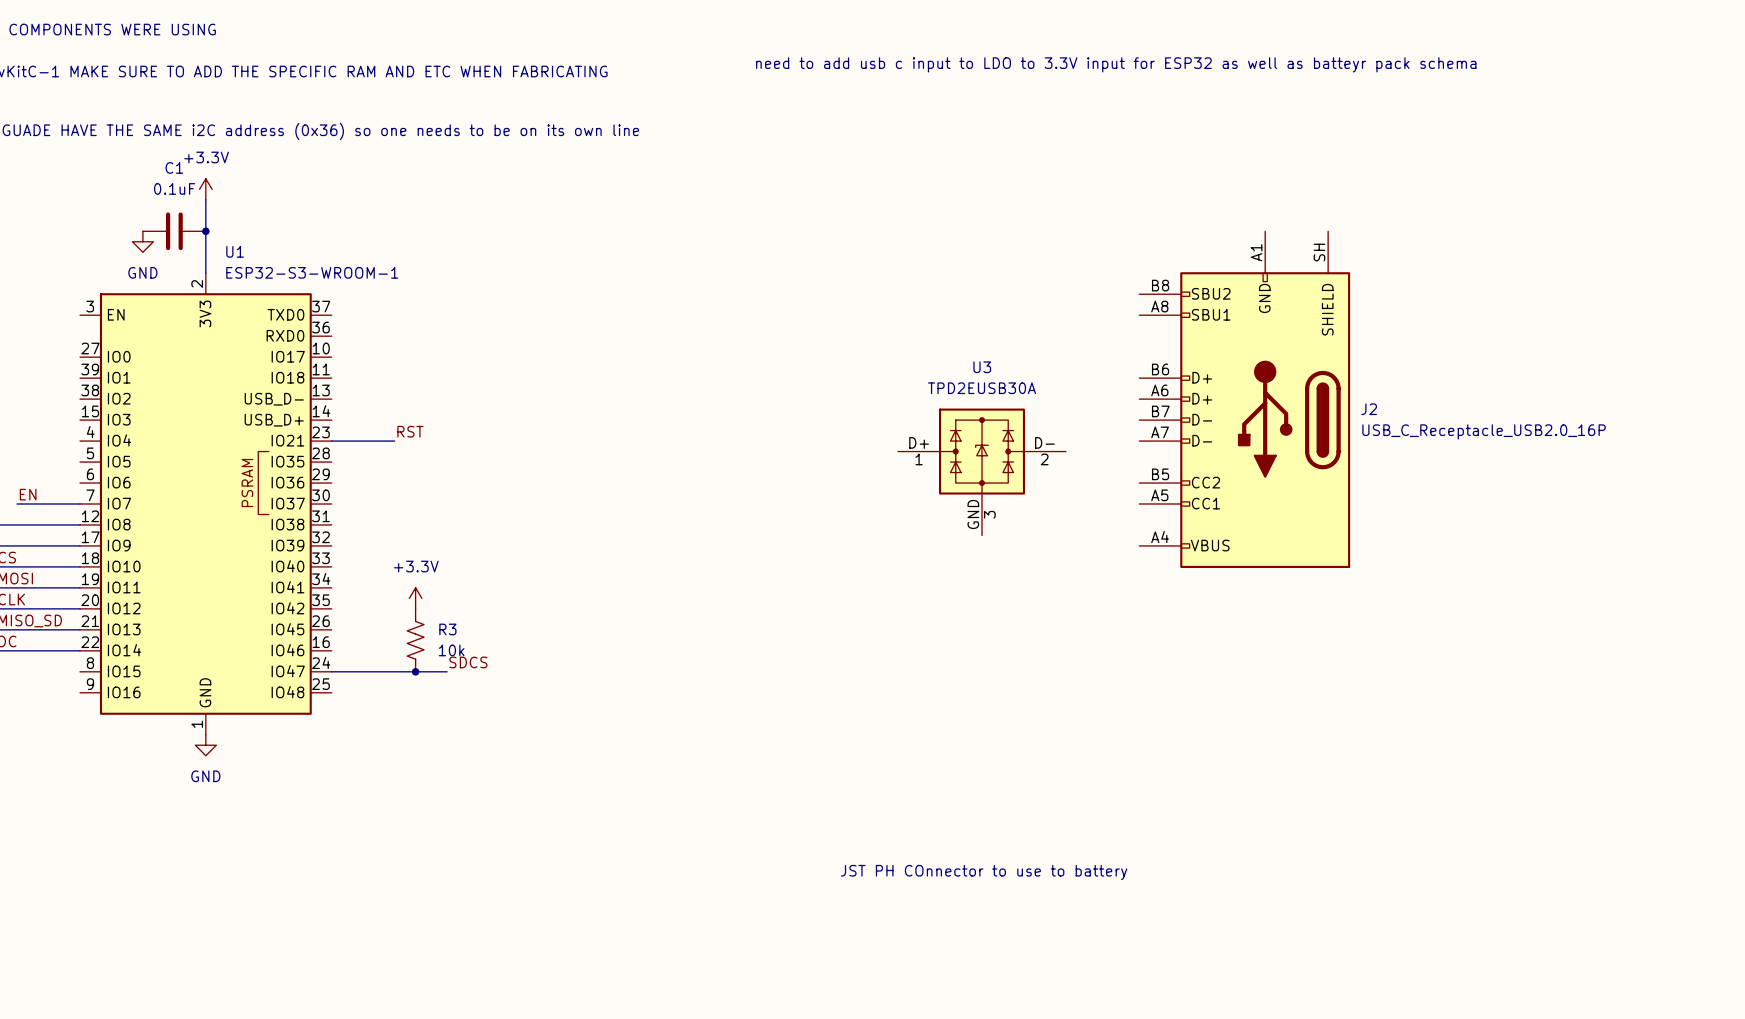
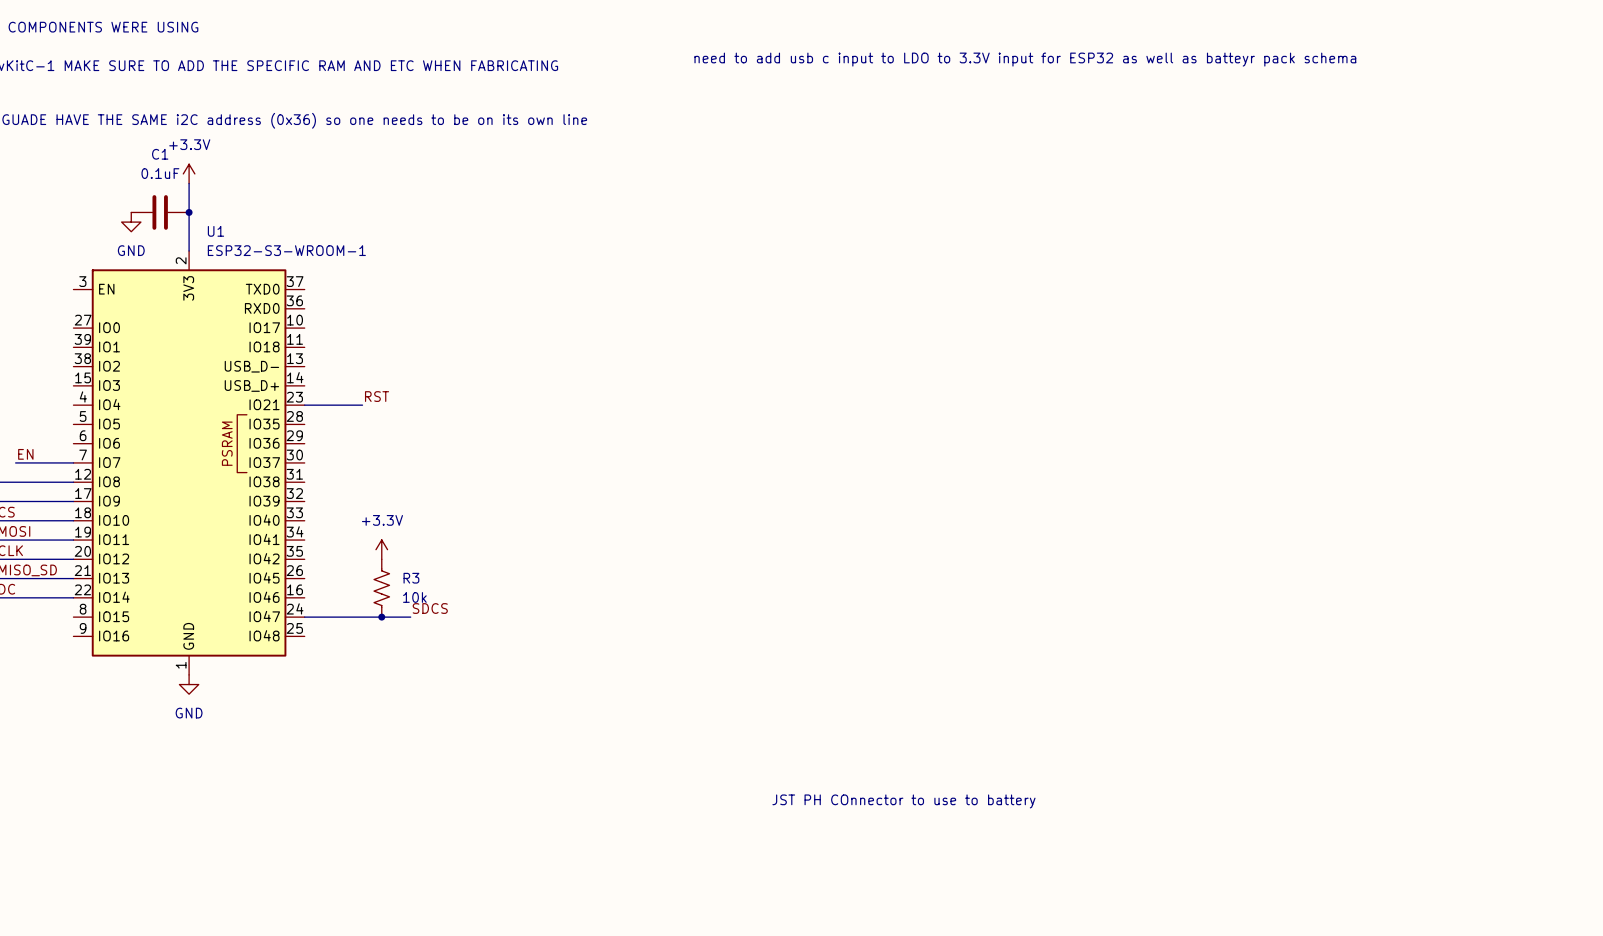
J2: USB_C_Receptacle_USB2.0_16P (1244, 399) -> none
U3: TPD2EUSB30A (982, 472) -> none

